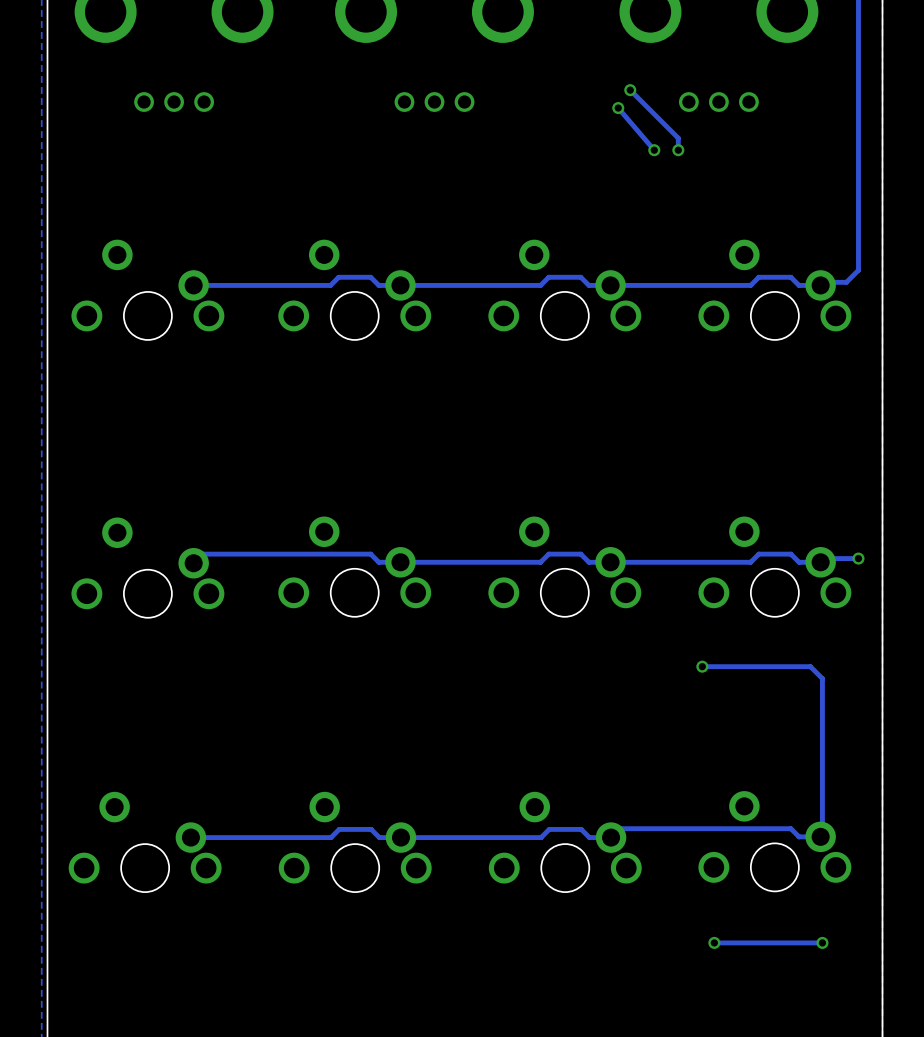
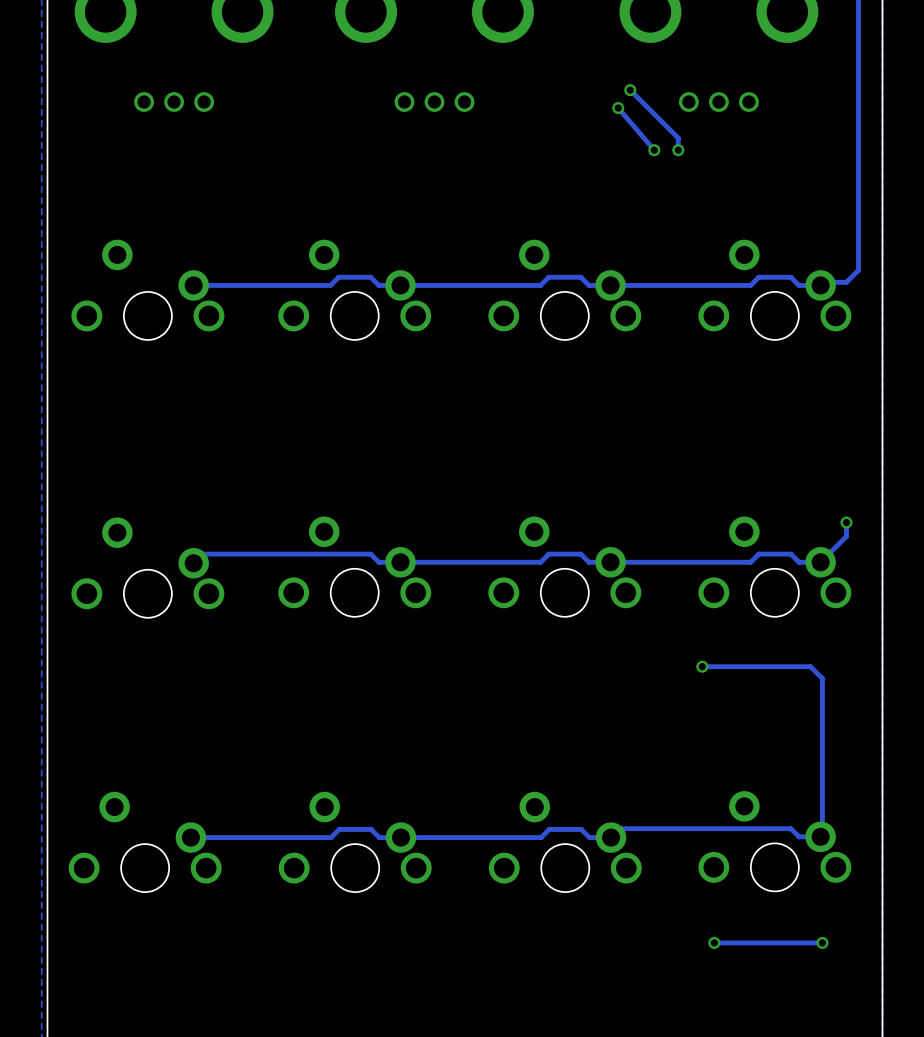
track: (858, 558) (824, 558) -> (846, 522) (846, 536) (824, 558)
via position: (858, 558) -> (846, 522)

